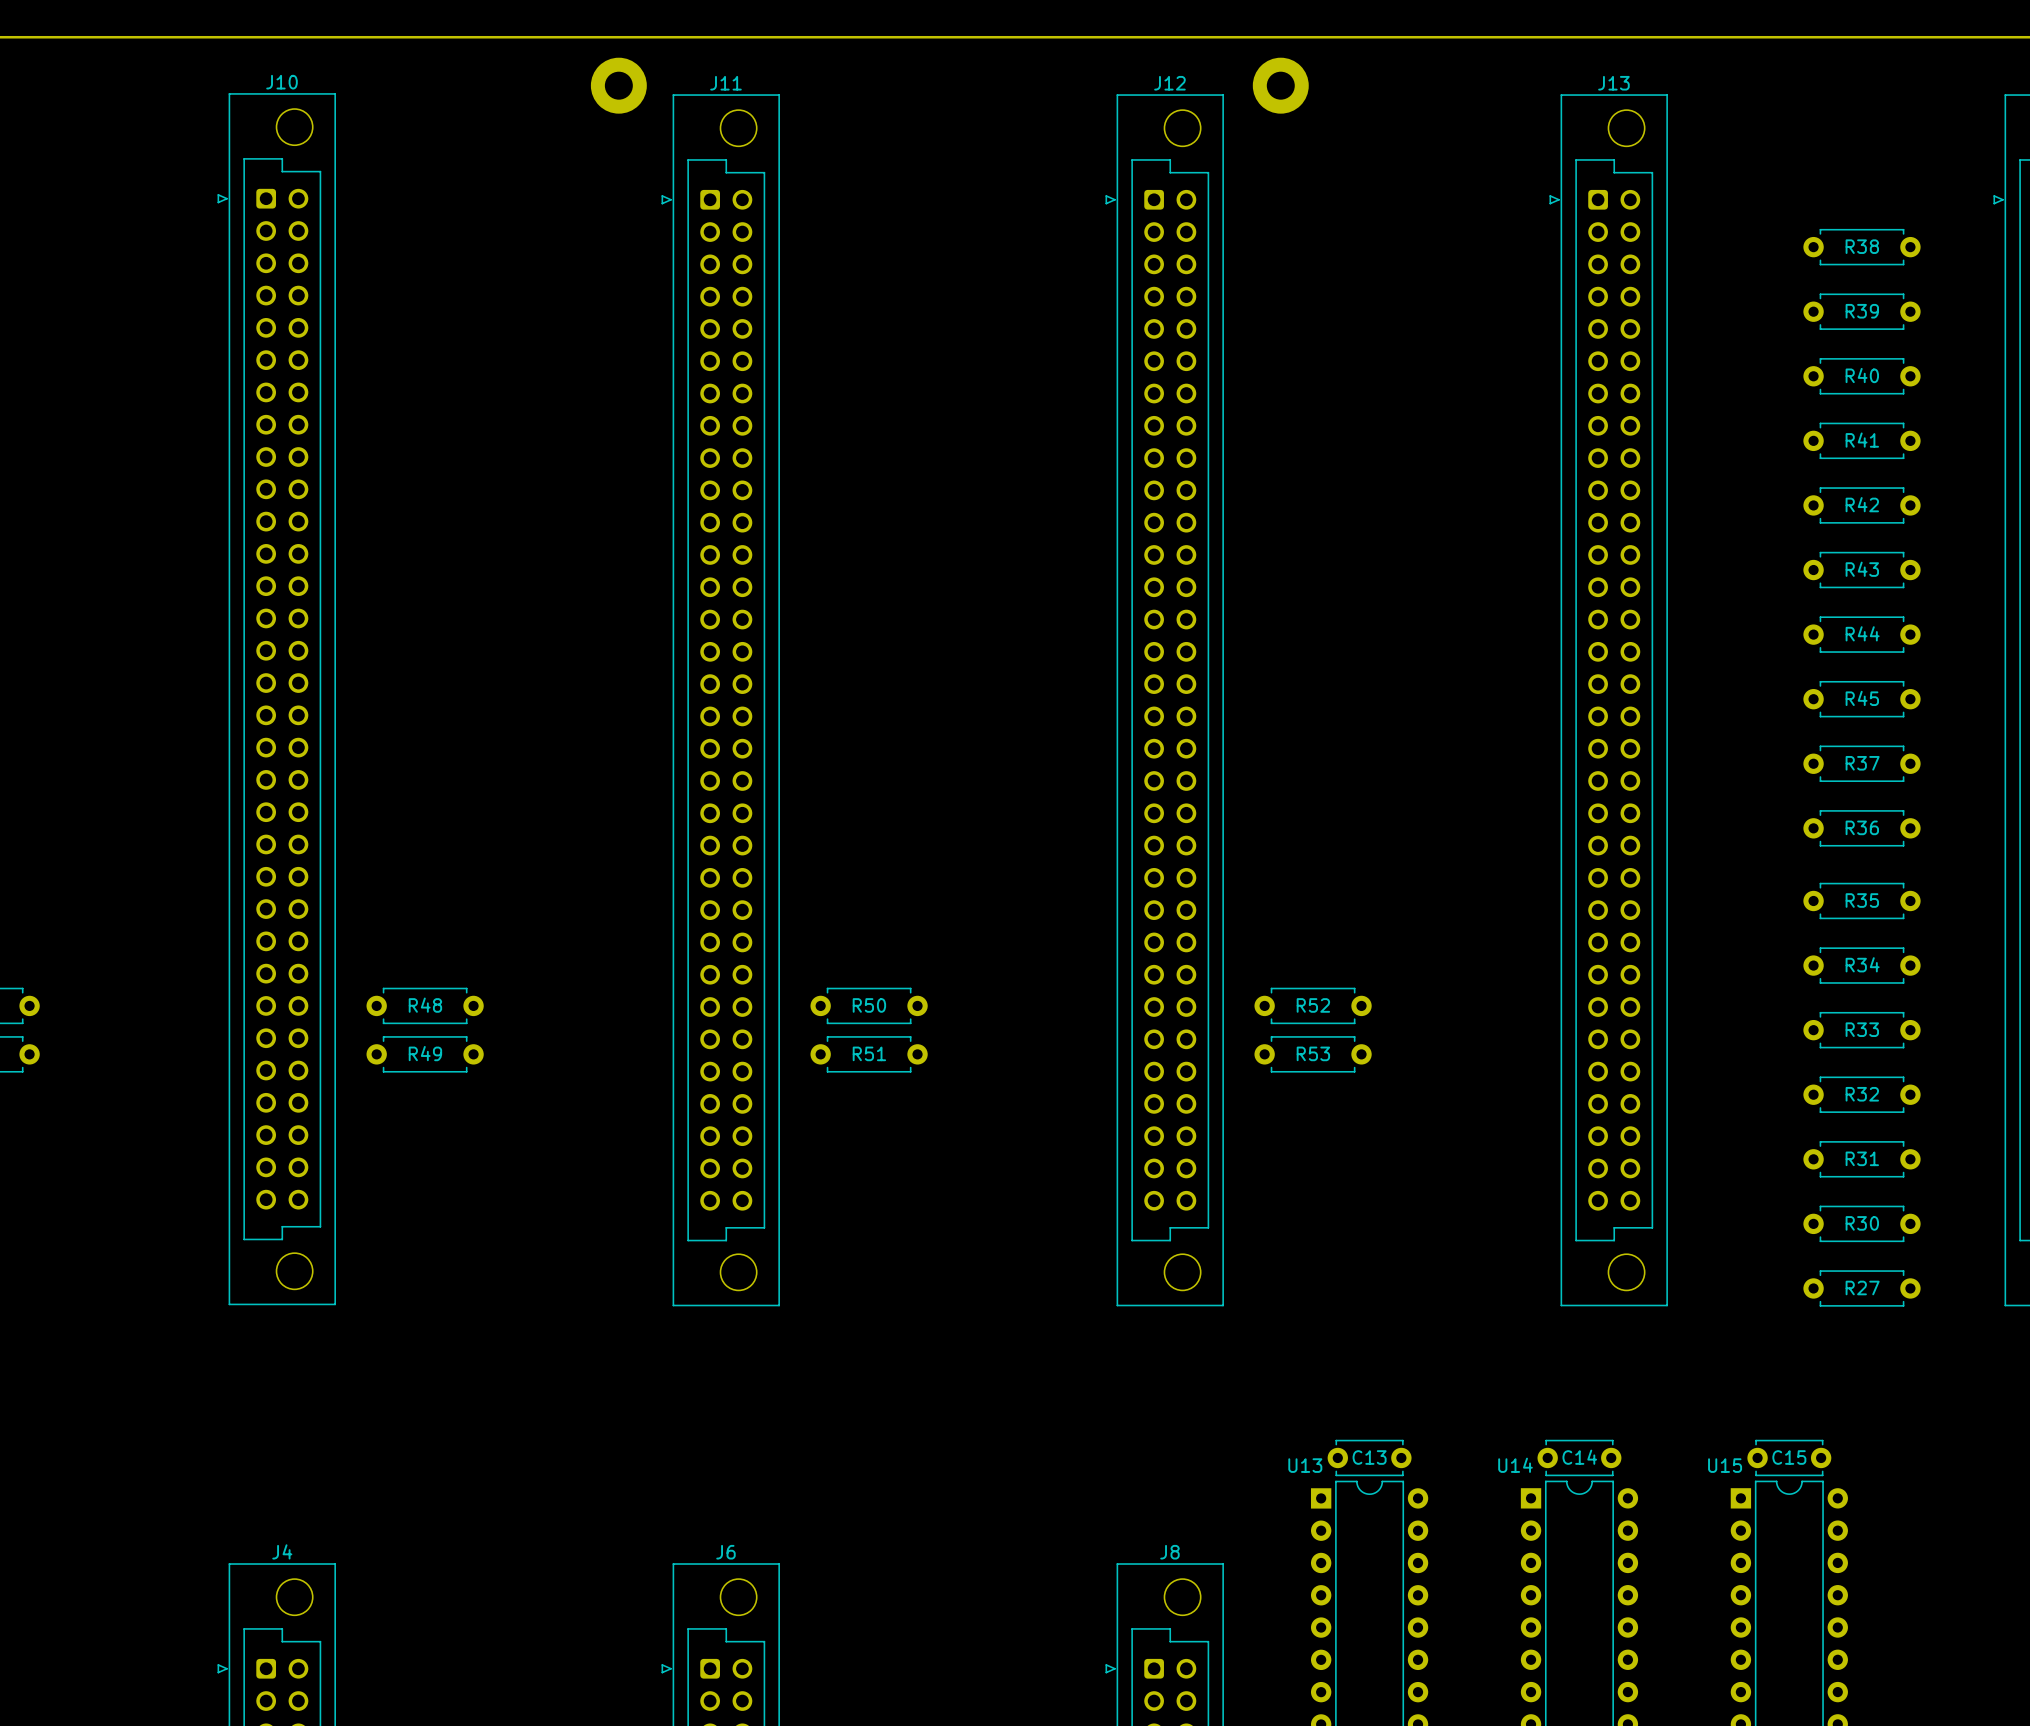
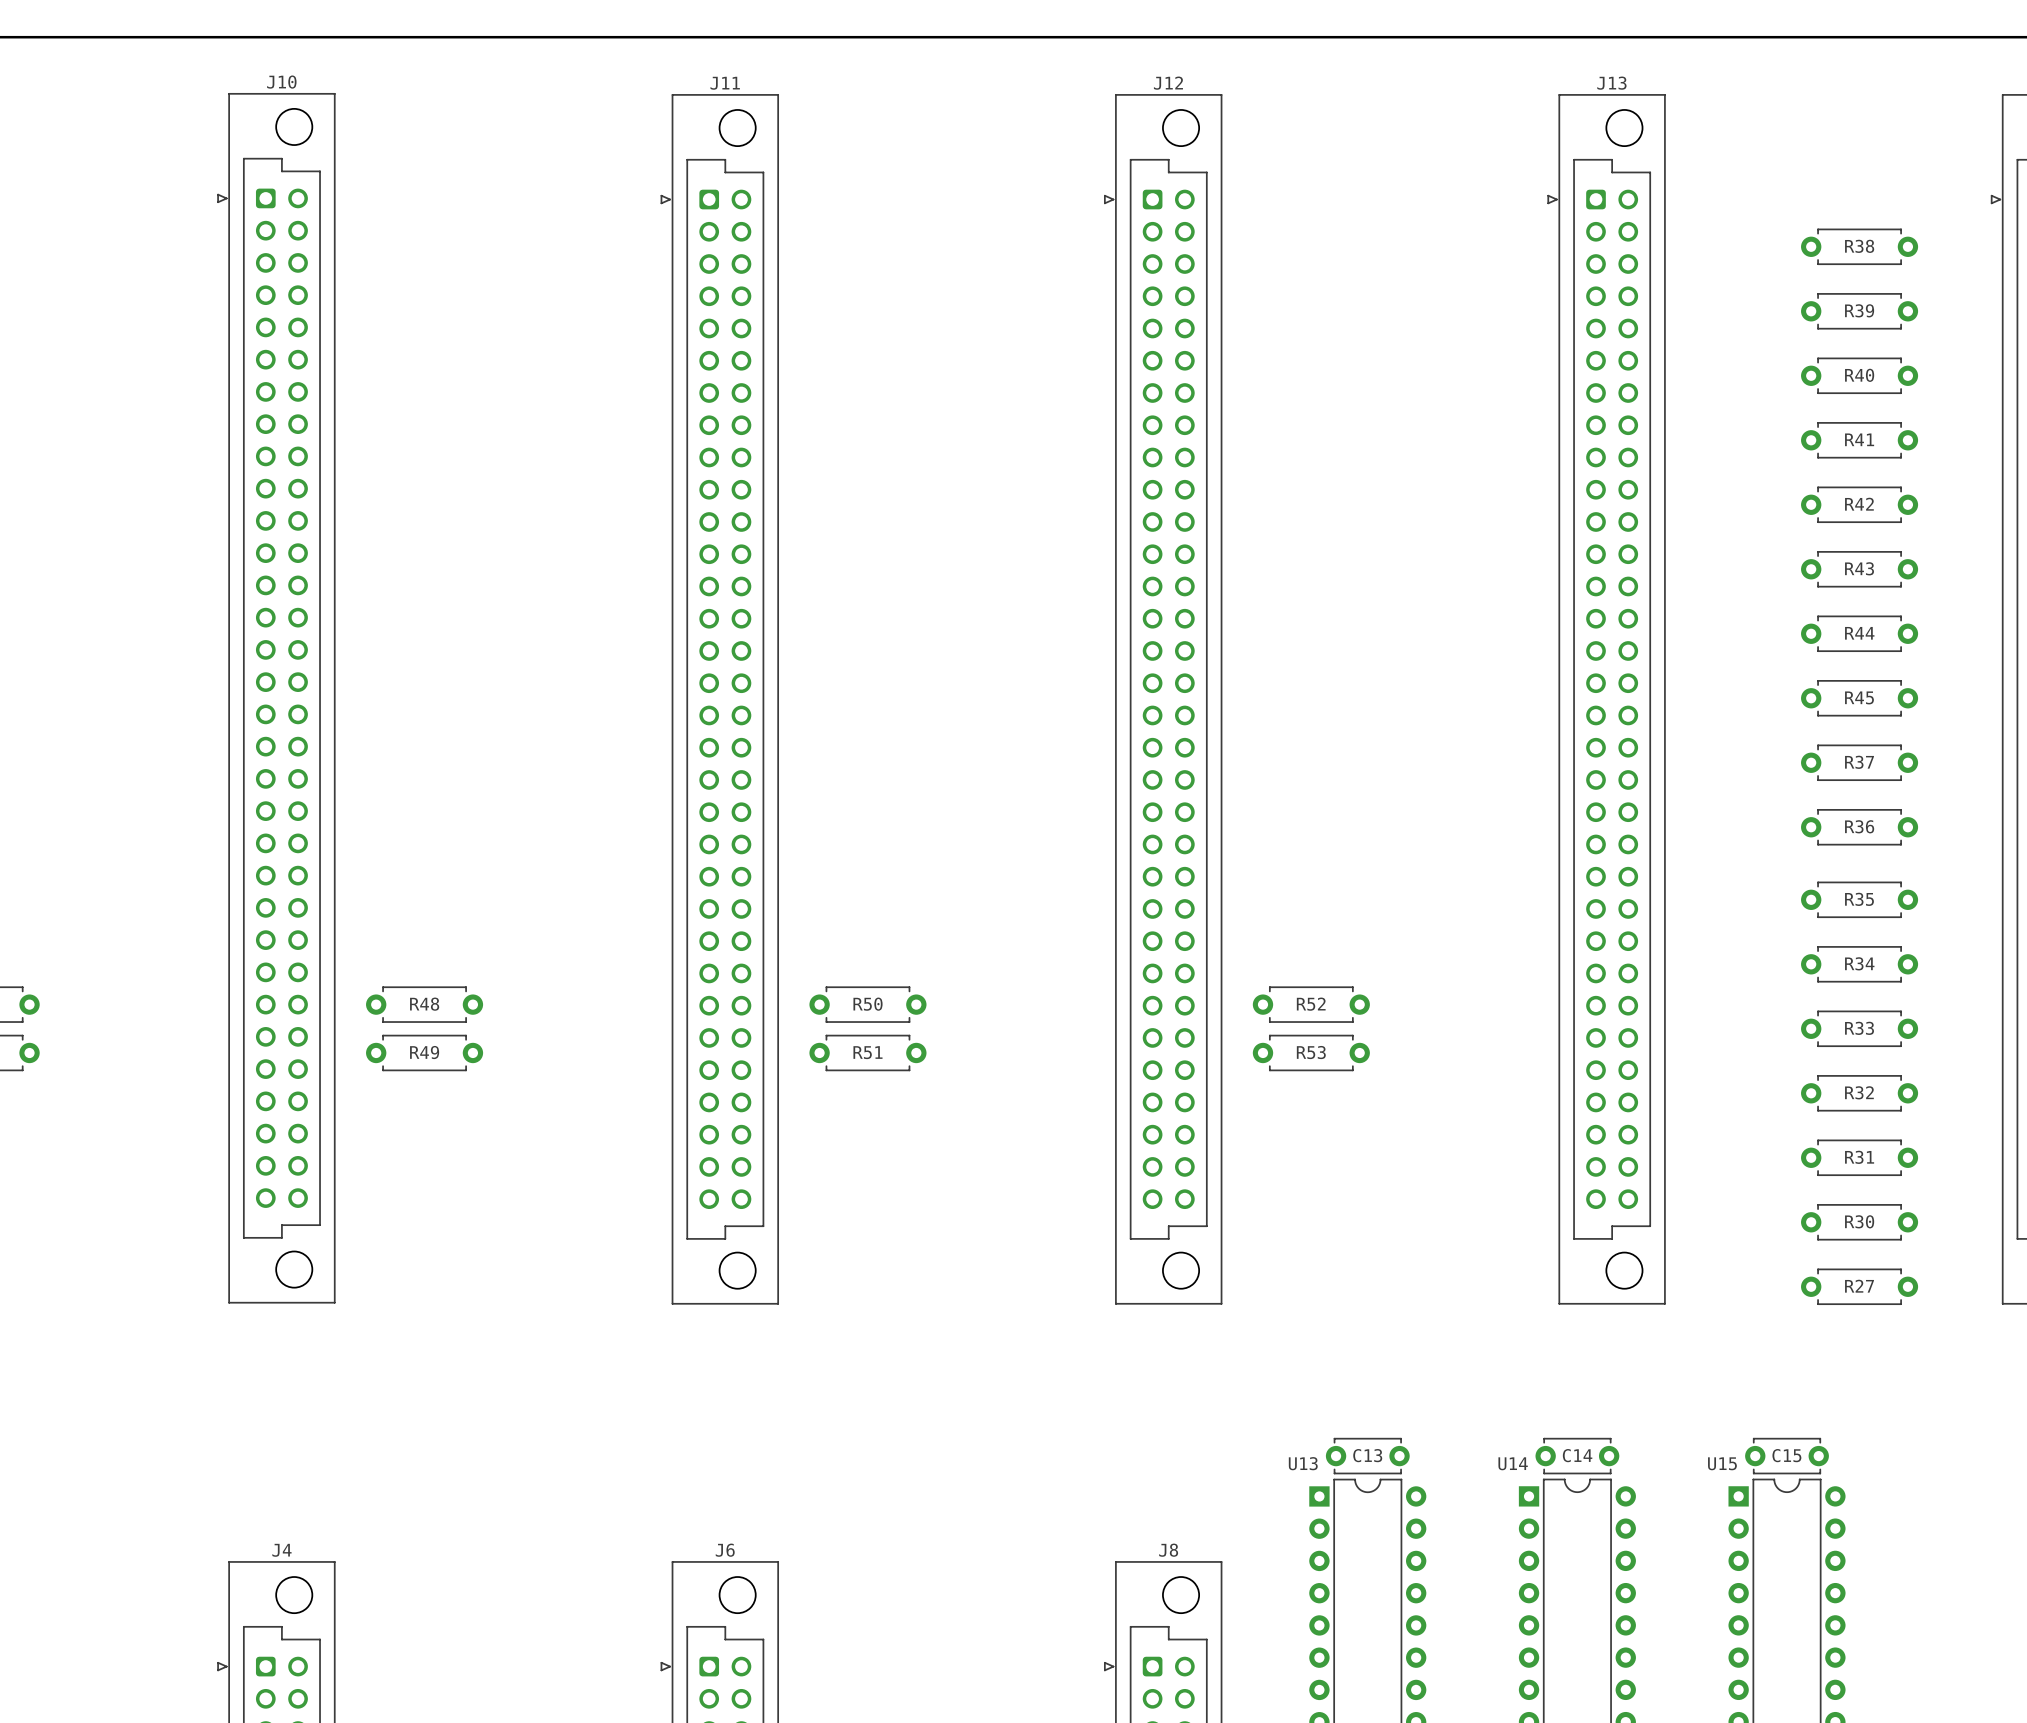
part: (618, 85) -> none
part: (1280, 85) -> none

